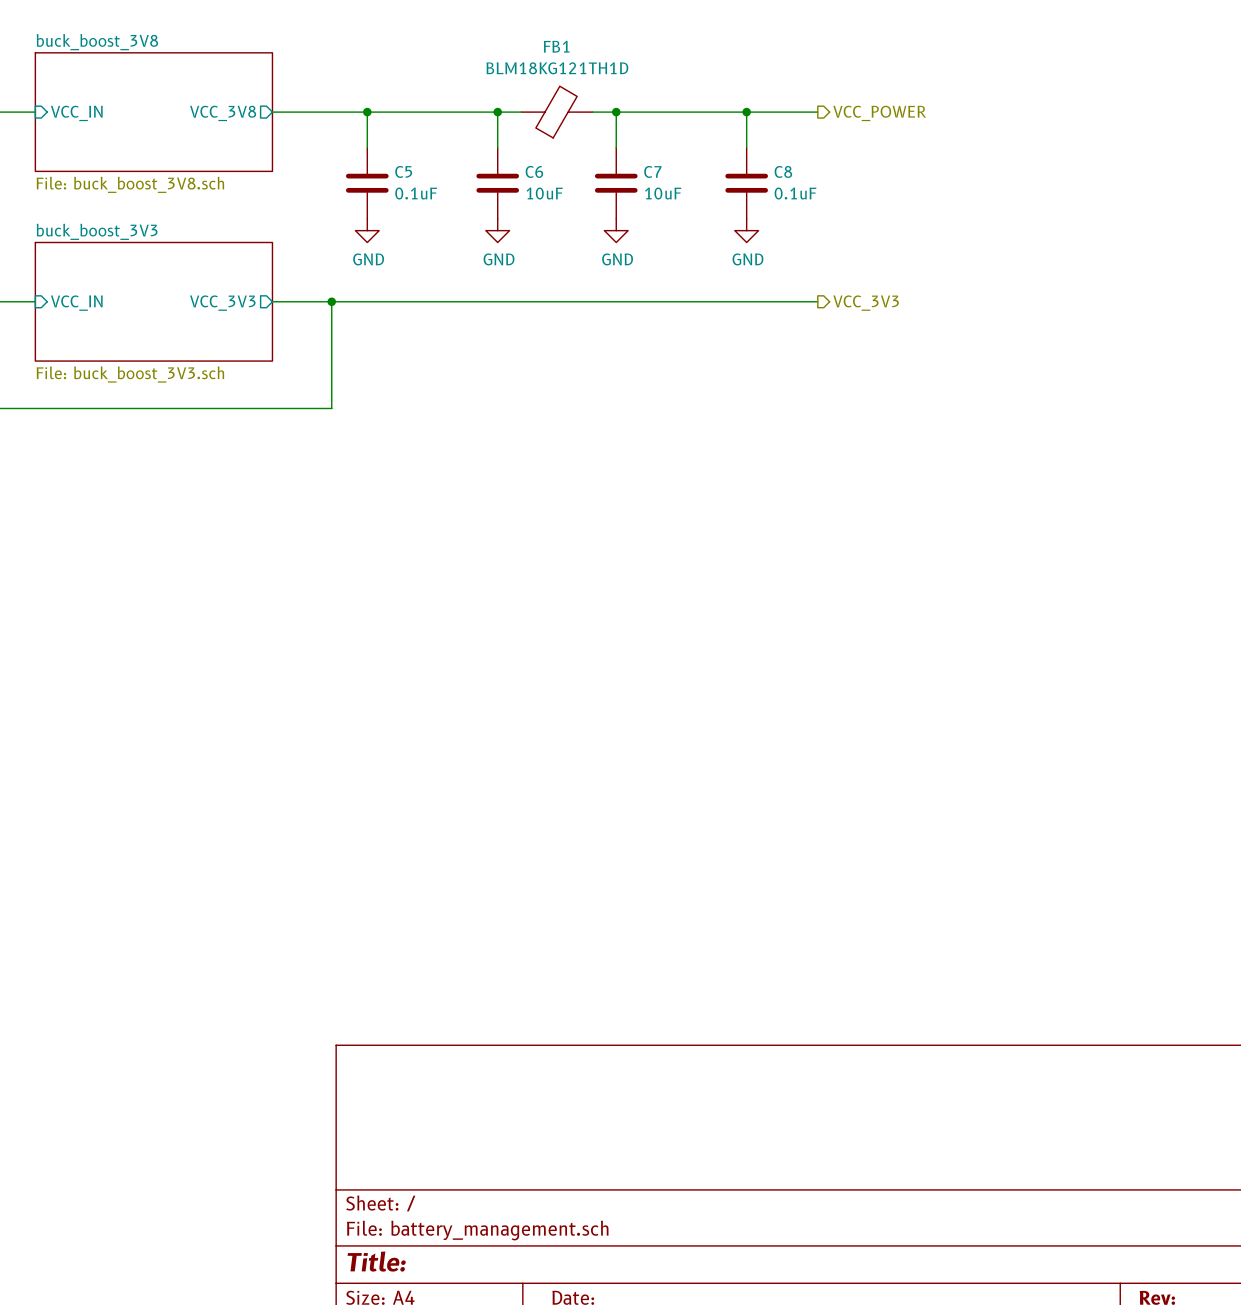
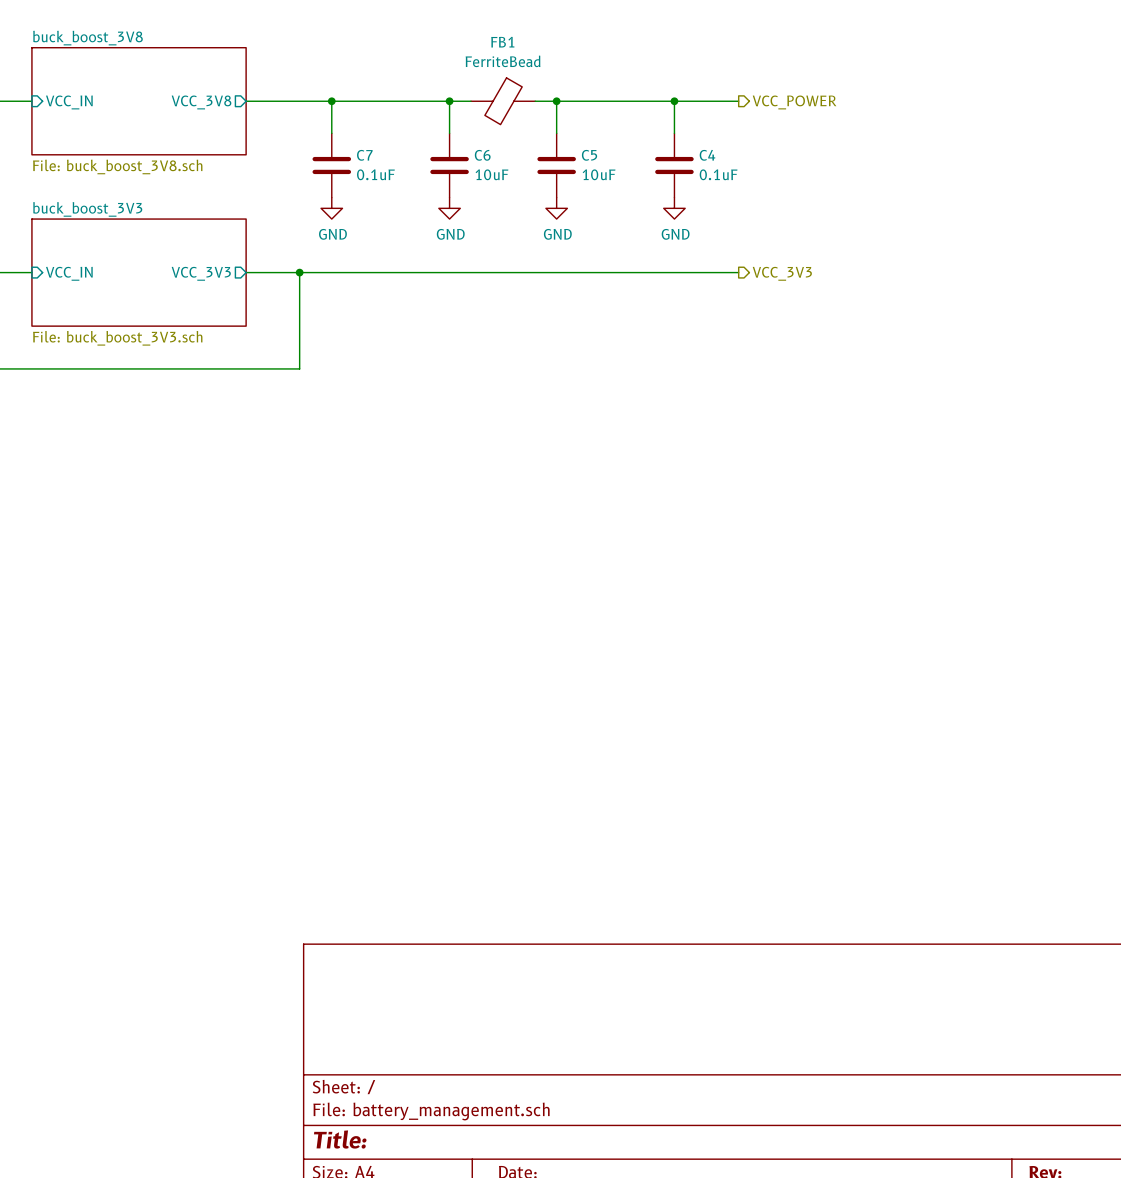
FB1 value: BLM18KG121TH1D (557, 68) -> FerriteBead (503, 61)
FB1 rotation: 0° (556, 112) -> 180° (503, 101)
C5 name: C5 (403, 171) -> C7 (364, 155)
C7 name: C7 (652, 171) -> C5 (589, 155)
C8 name: C8 (783, 171) -> C4 (707, 155)

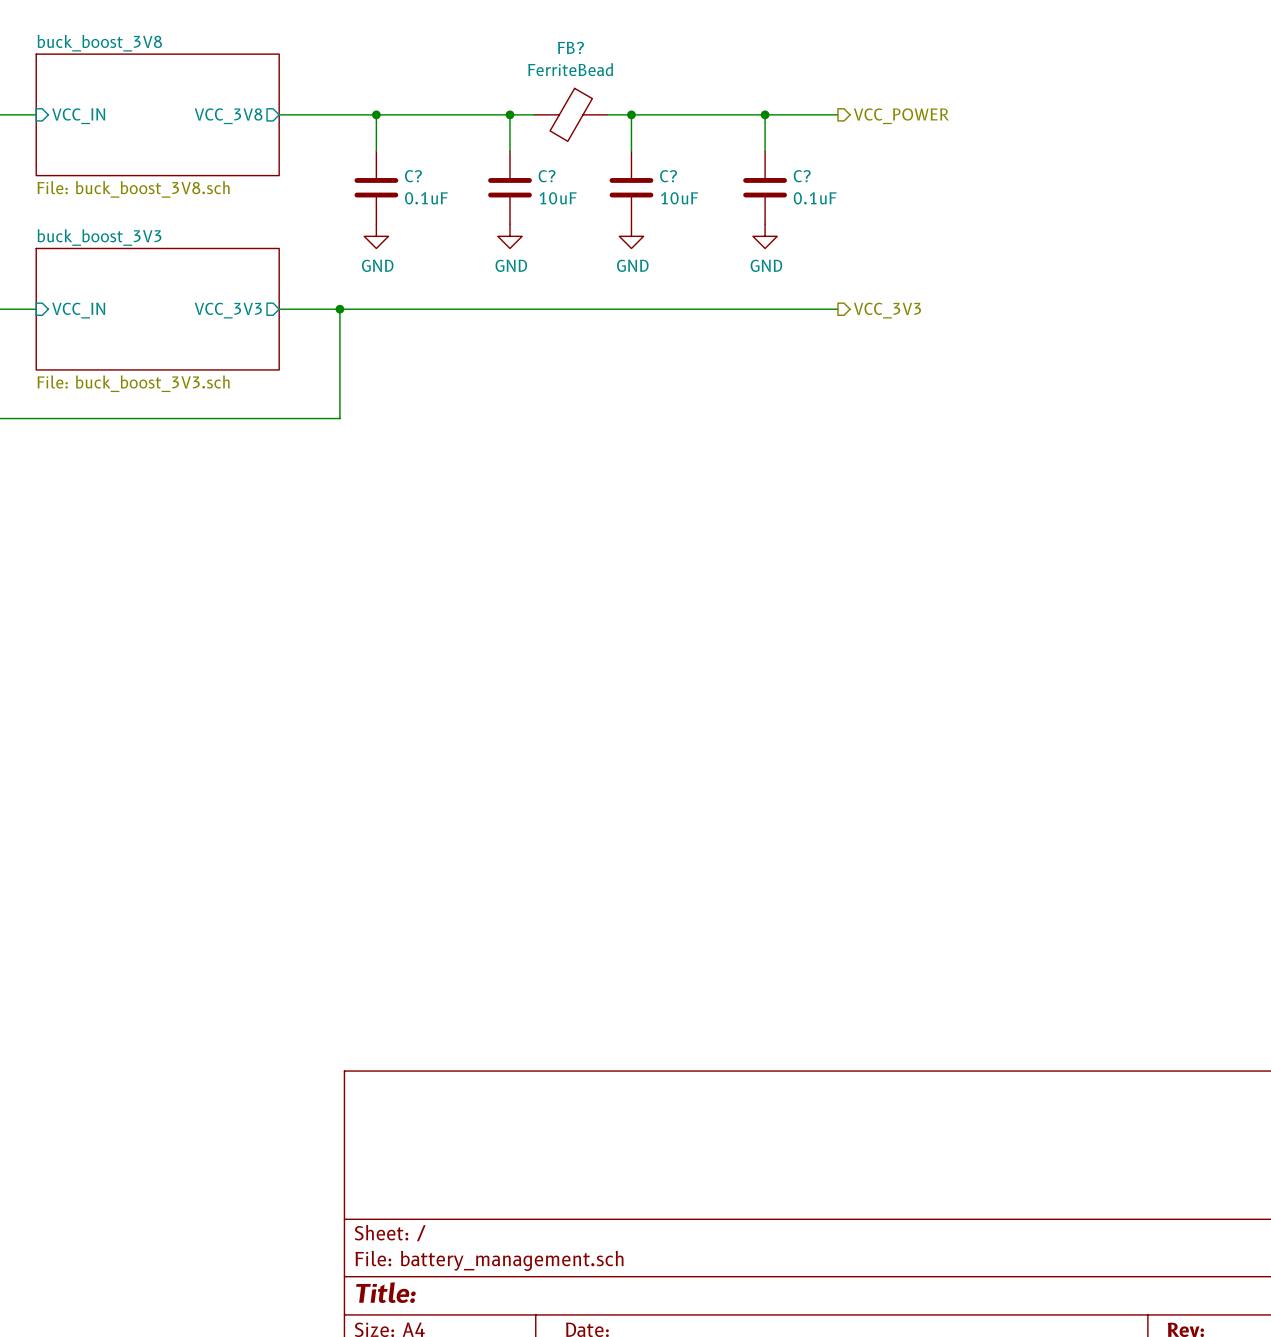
FB1 name: FB1 (502, 42) -> FB? (570, 47)
C7 name: C7 (364, 155) -> C? (413, 176)
C6 name: C6 (482, 155) -> C? (547, 176)
C5 name: C5 (589, 155) -> C? (668, 176)
C4 name: C4 (707, 155) -> C? (802, 176)

